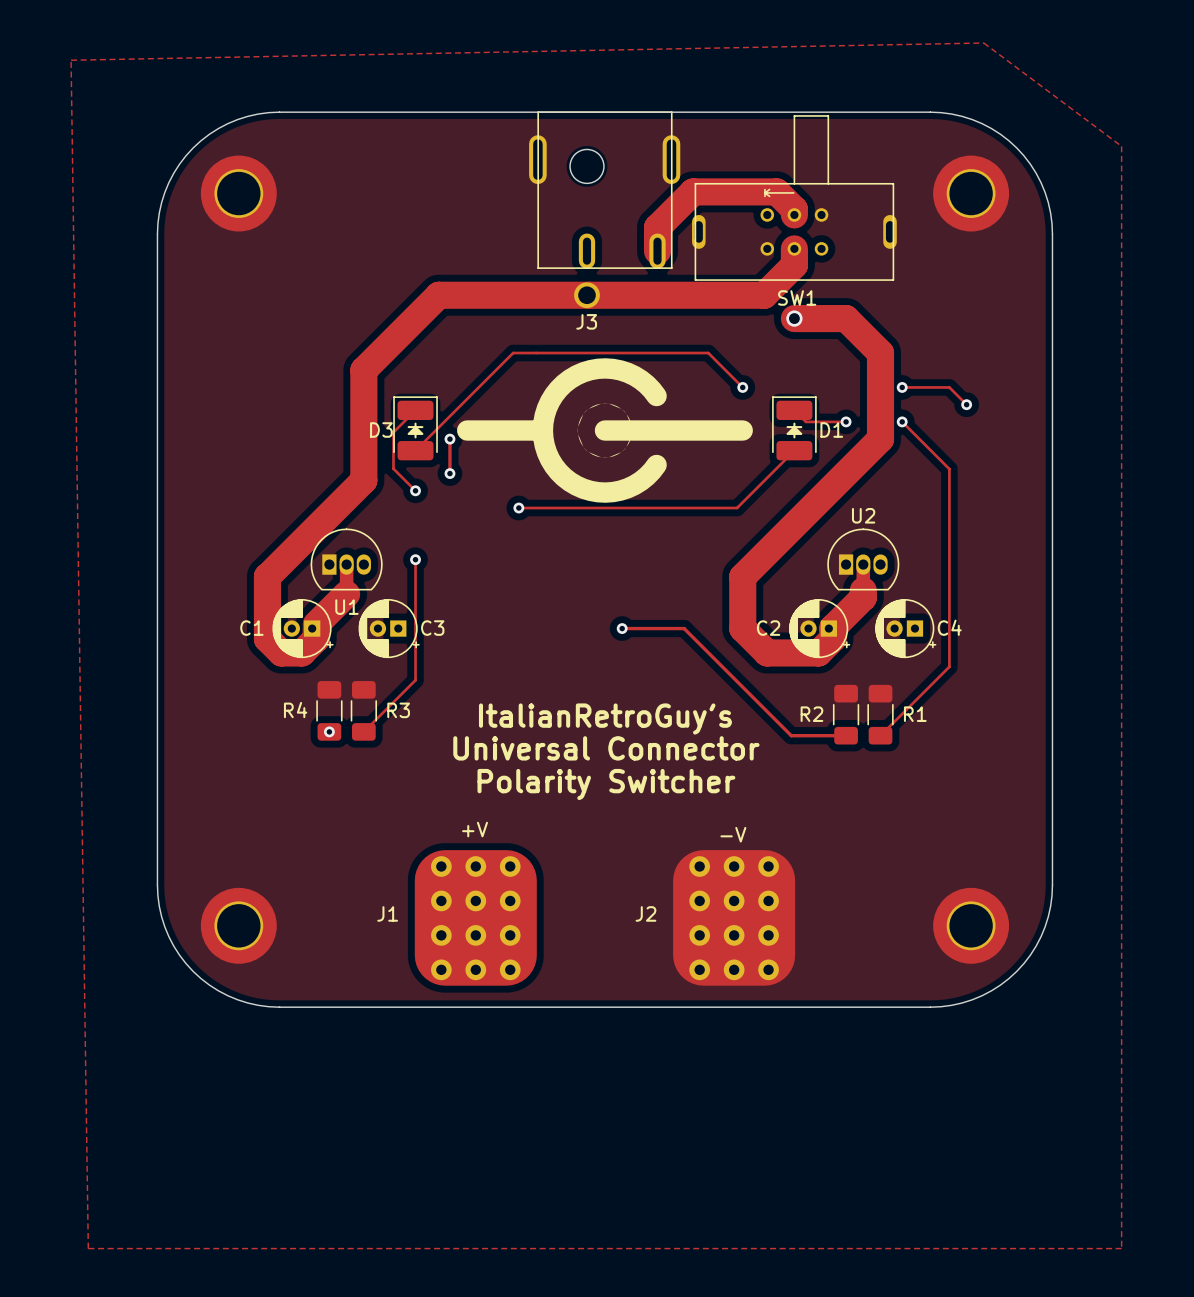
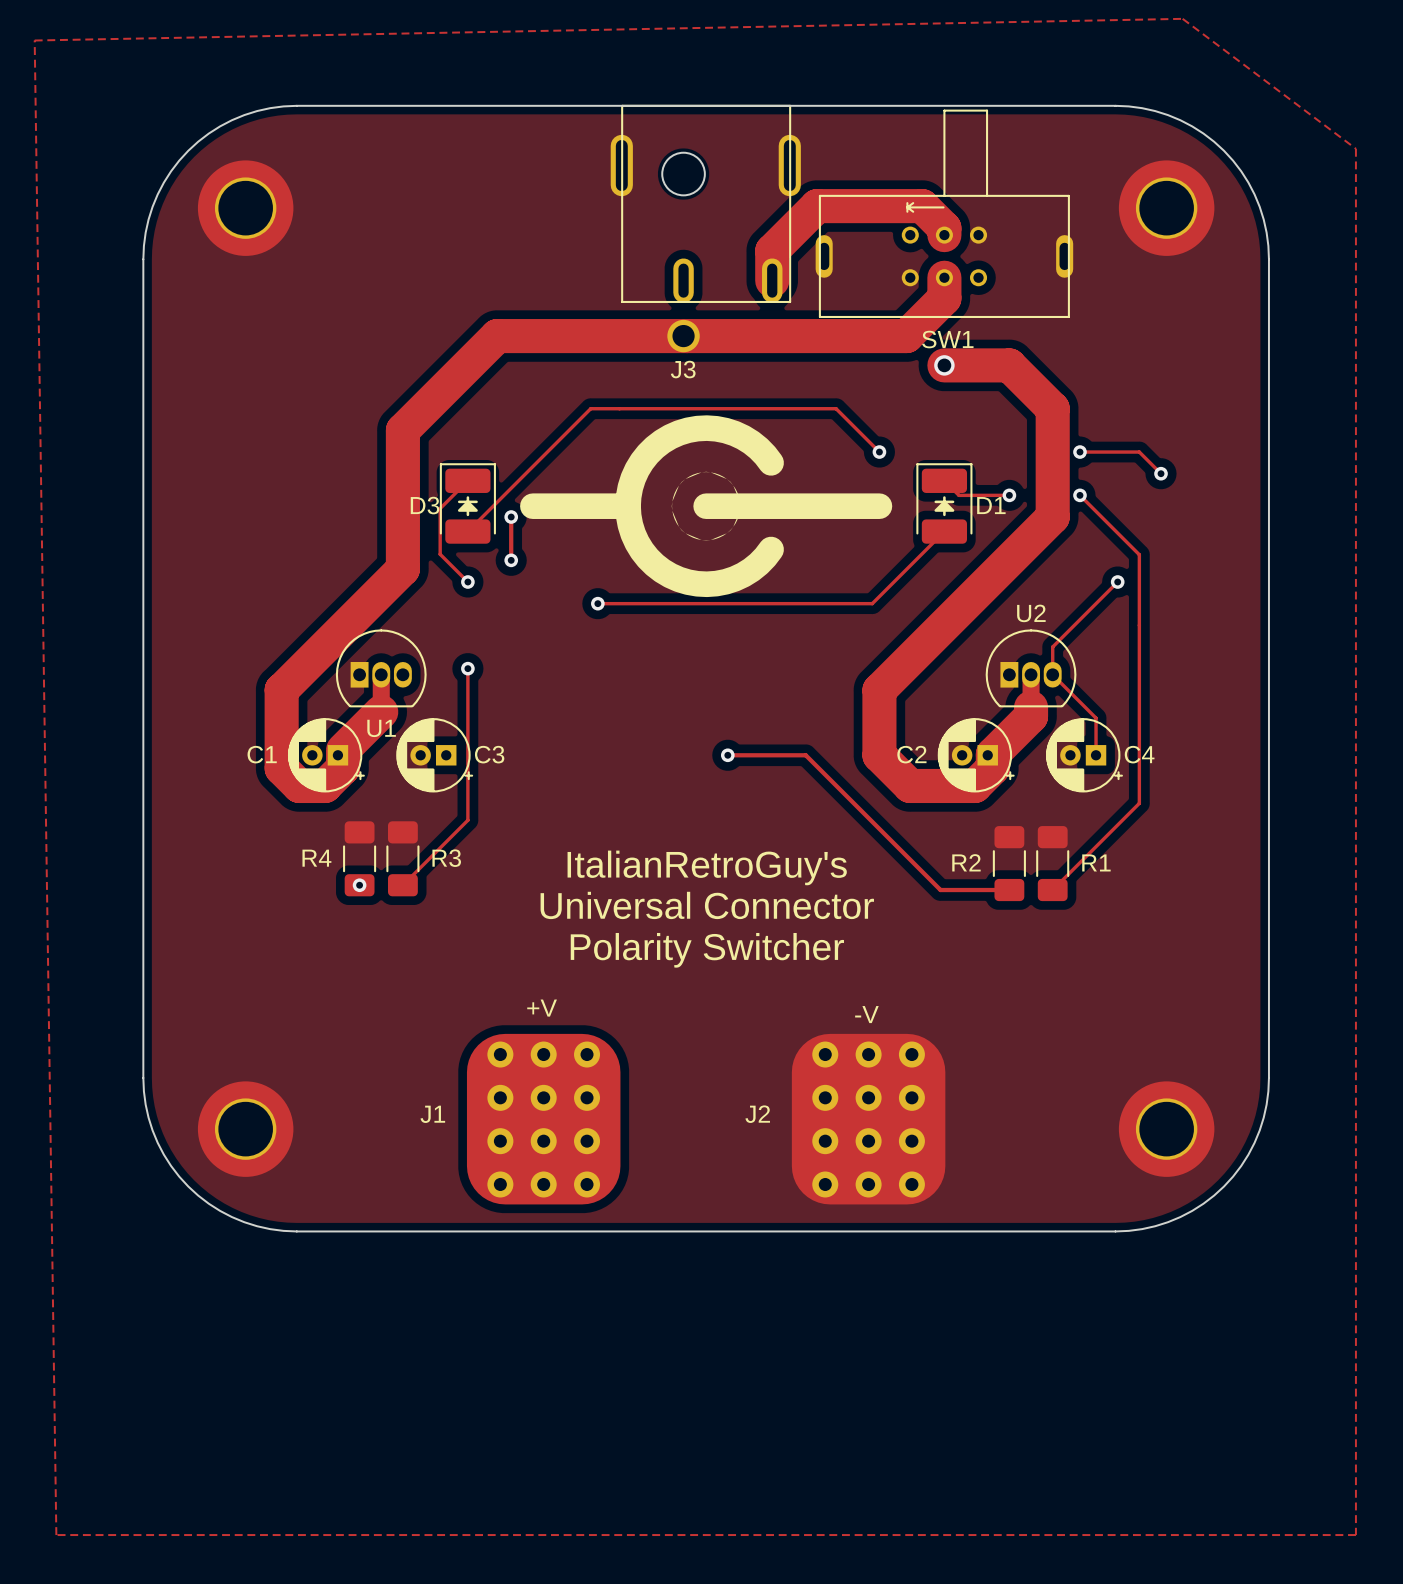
track: none -> (1117, 582) (1052, 646) (1052, 674) (1096, 718) (1096, 755)
via: none -> (1117, 582)

